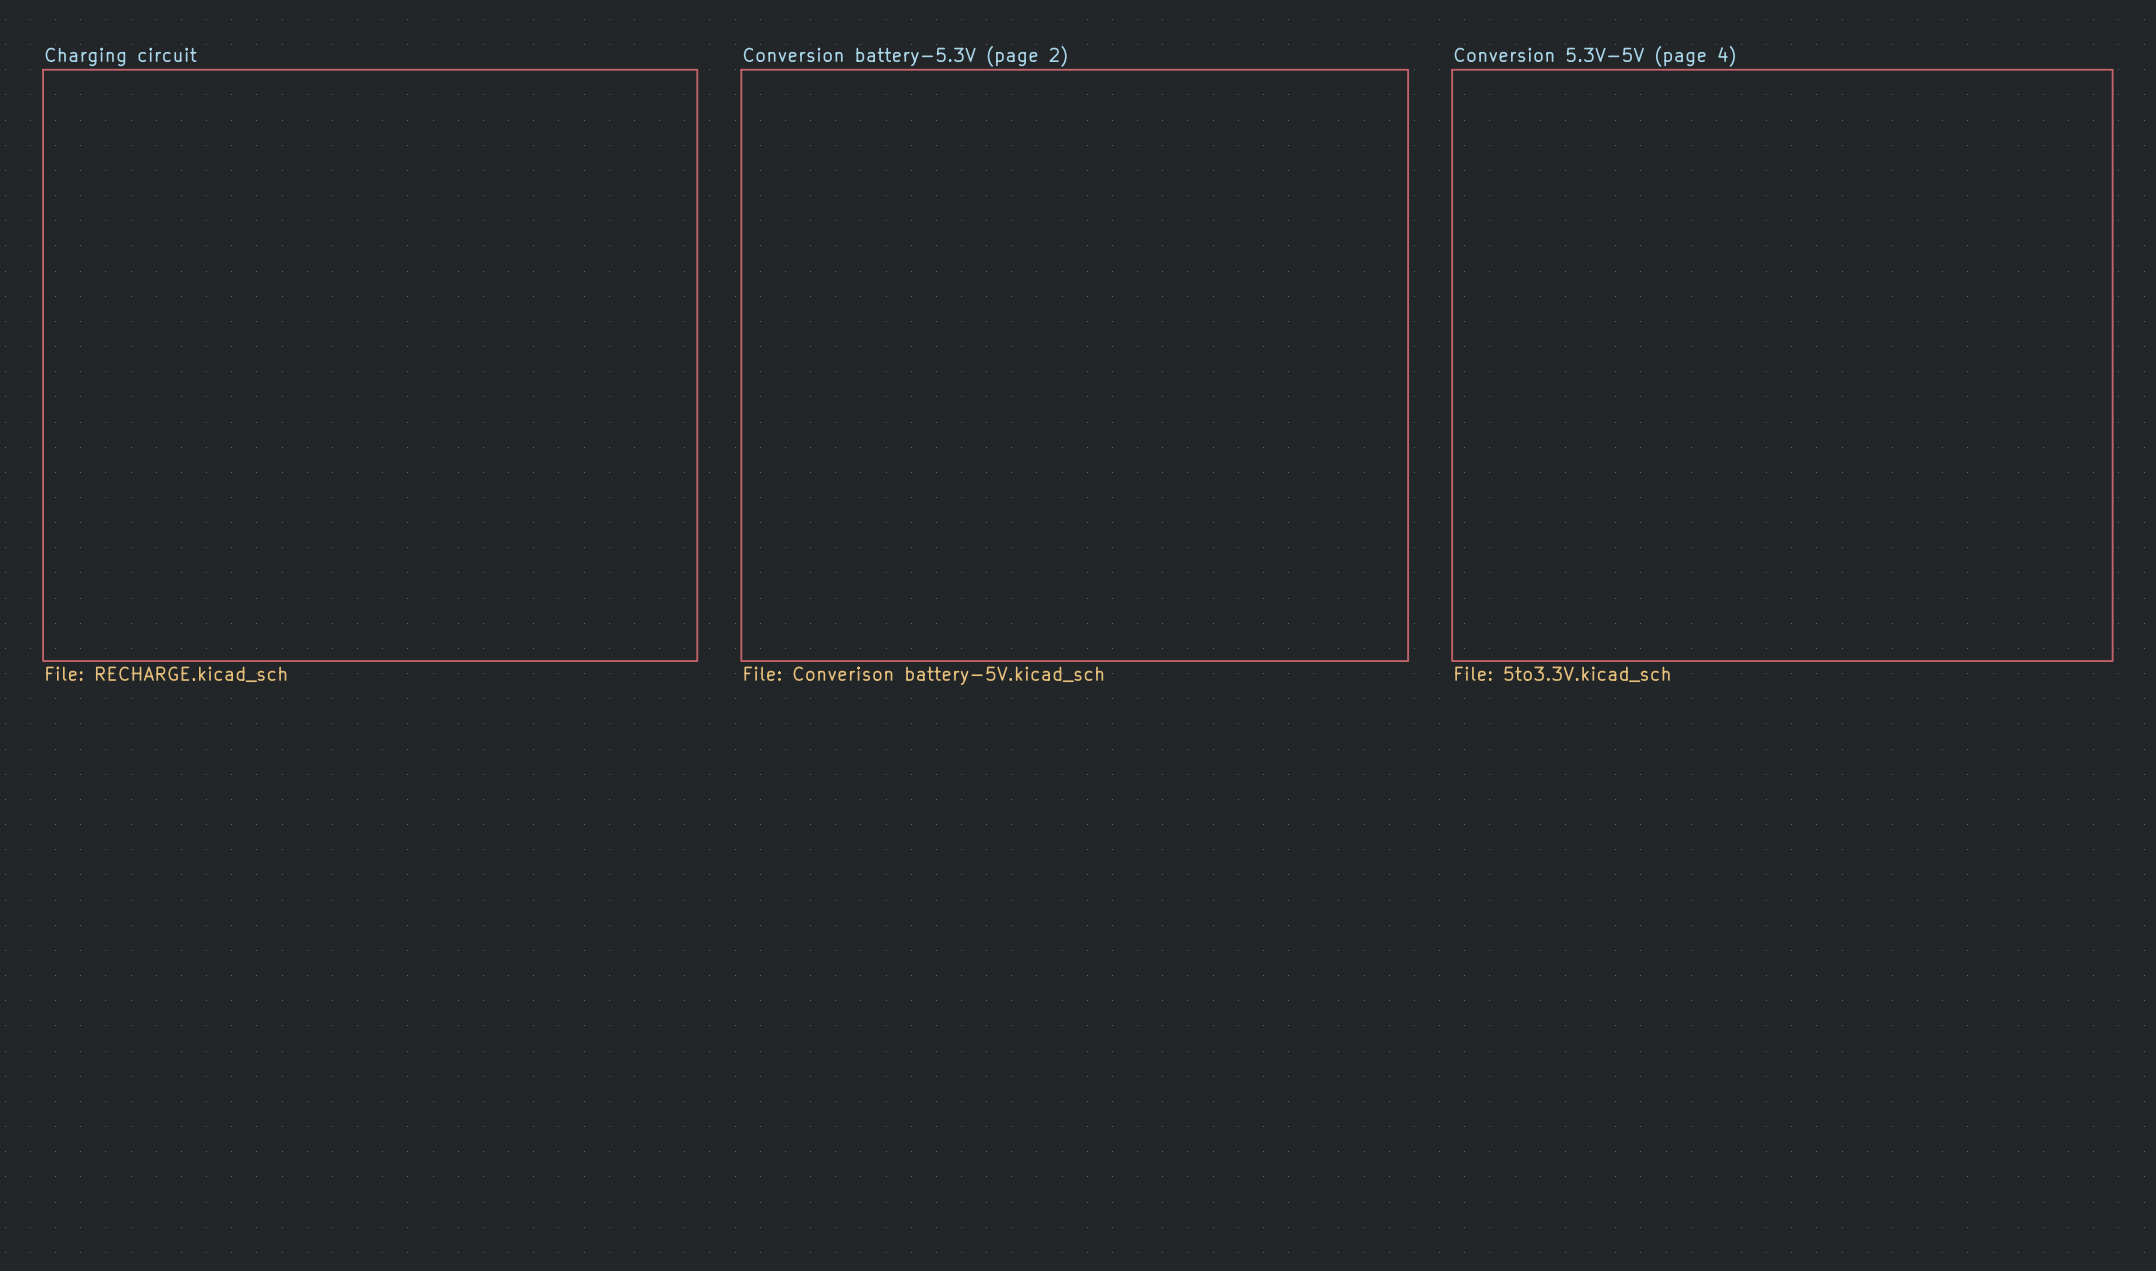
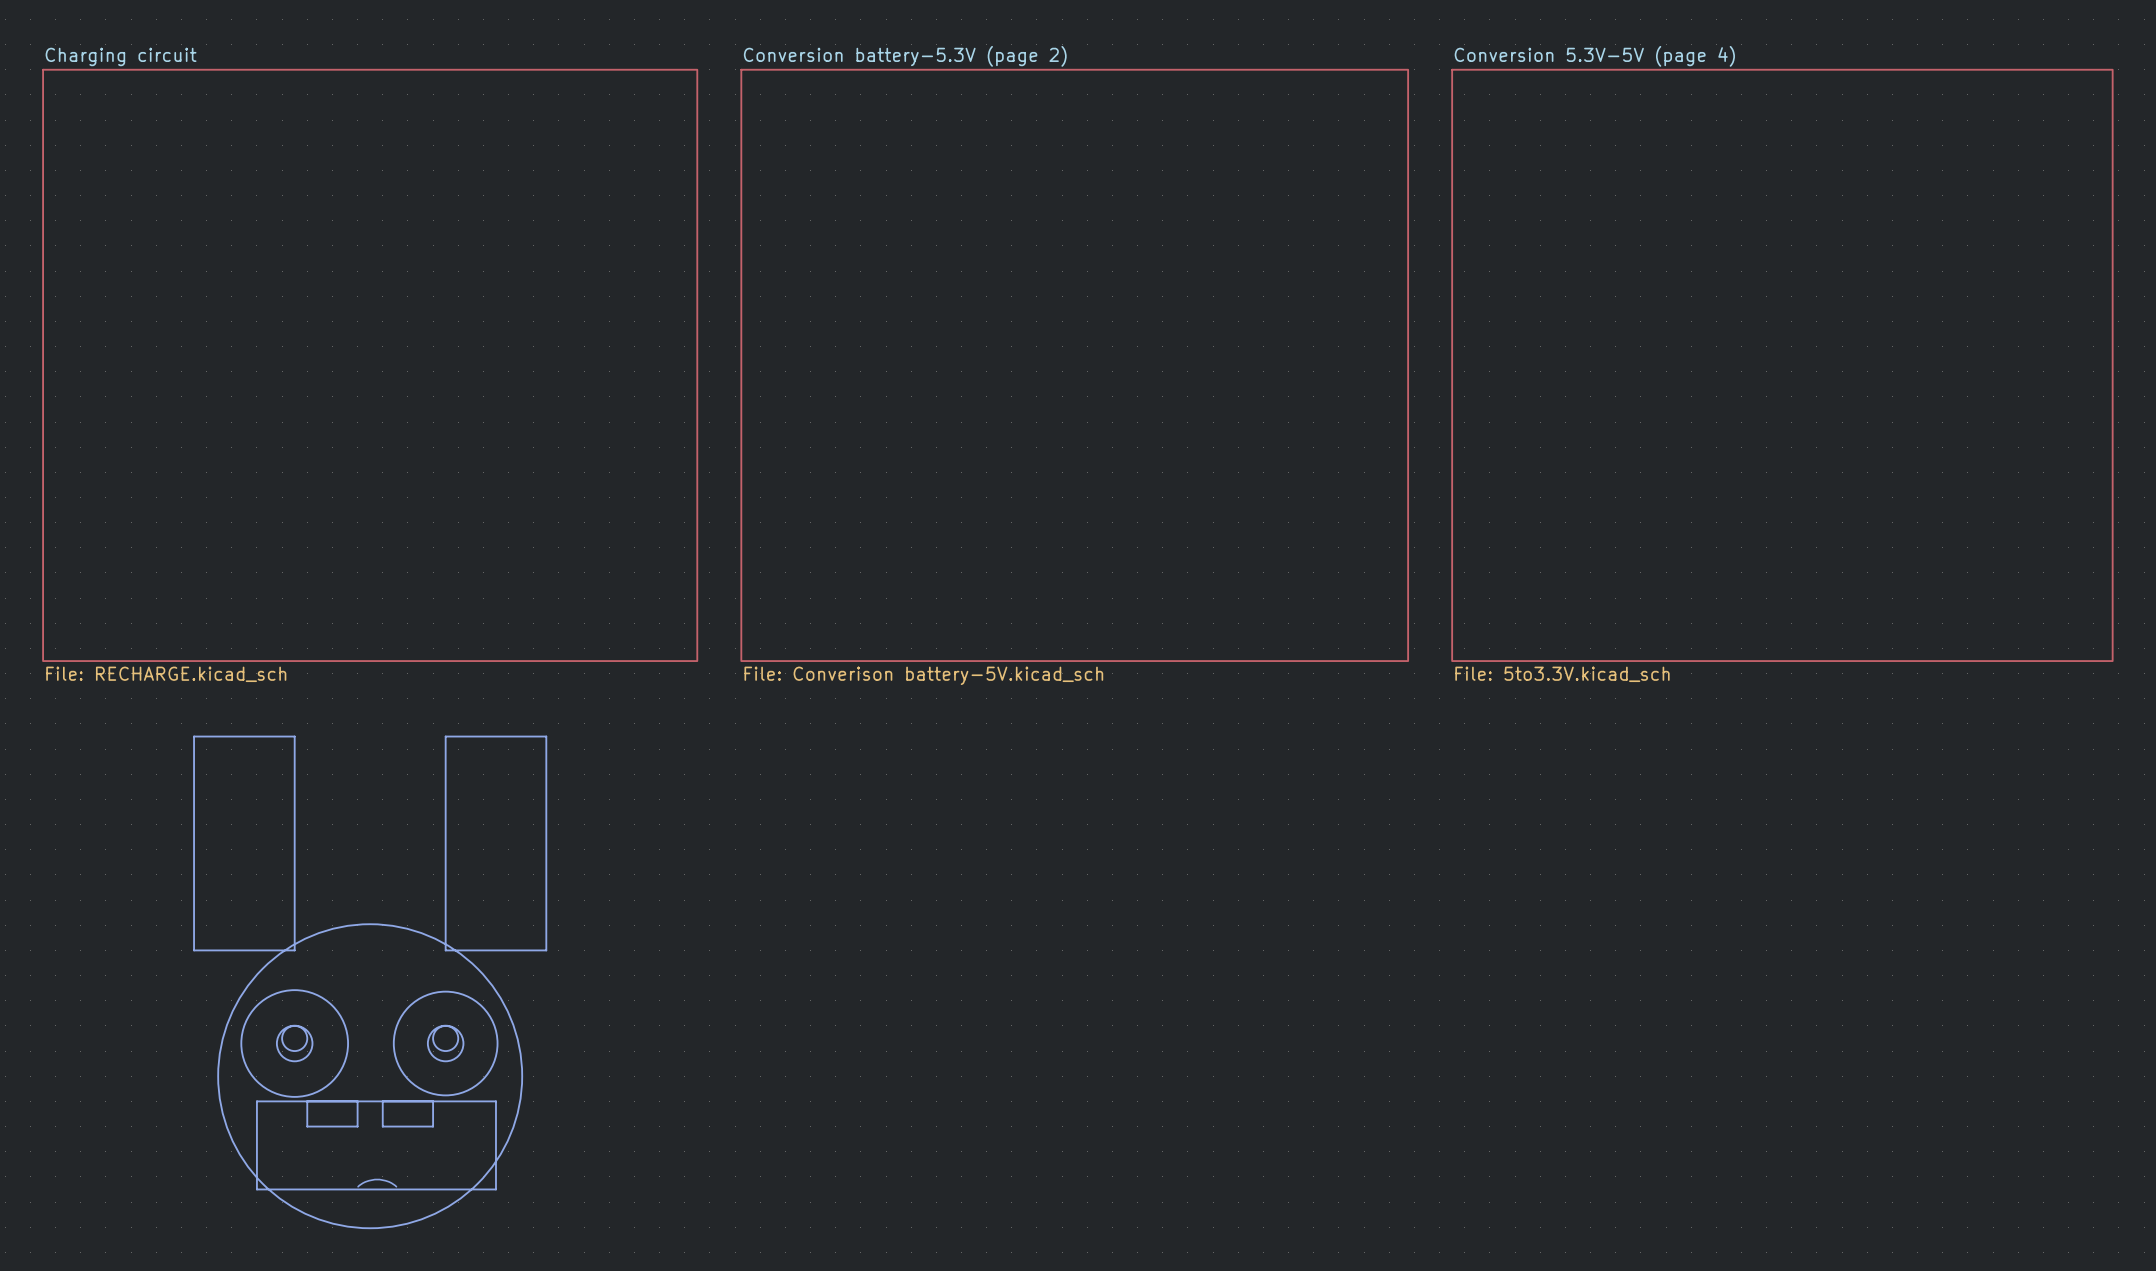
line: none -> (194, 736) (294, 736) (294, 950) (194, 950) (194, 736)
line: none -> (445, 736) (546, 736) (546, 950) (445, 950) (445, 736)
drawing: none -> [218, 924, 523, 1229]
line: none -> (256, 1101) (495, 1101) (495, 1189) (256, 1189) (256, 1101)
line: none -> (307, 1101) (307, 1126) (357, 1126) (357, 1101)
line: none -> (382, 1101) (382, 1126) (433, 1126) (433, 1101)
text: none -> ) (377, 1183)

